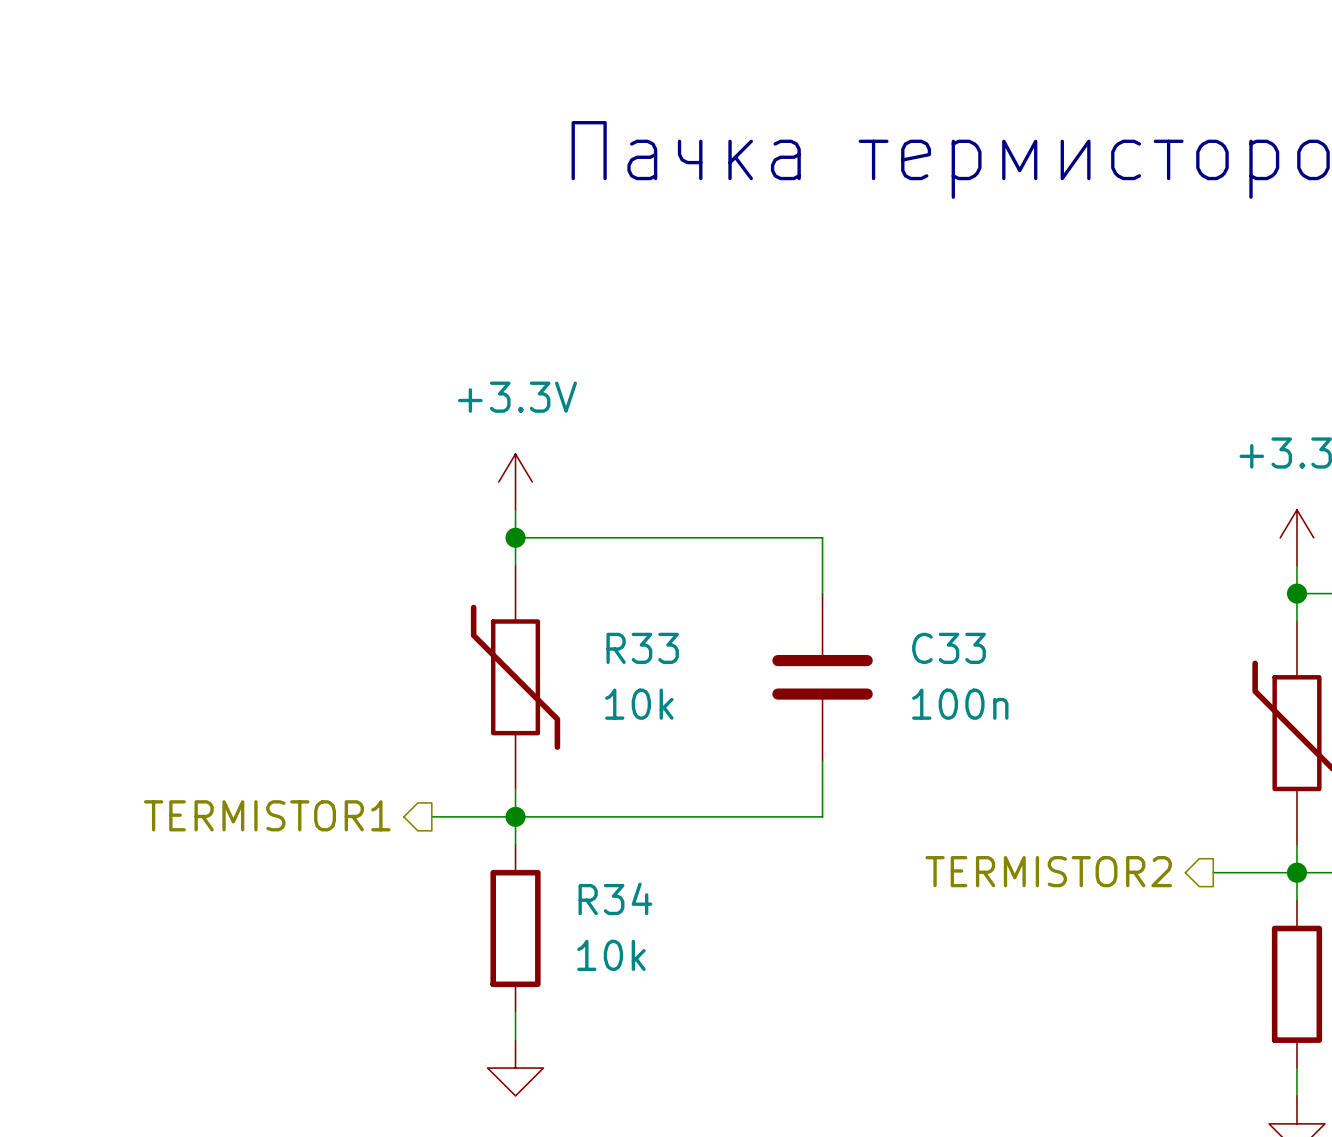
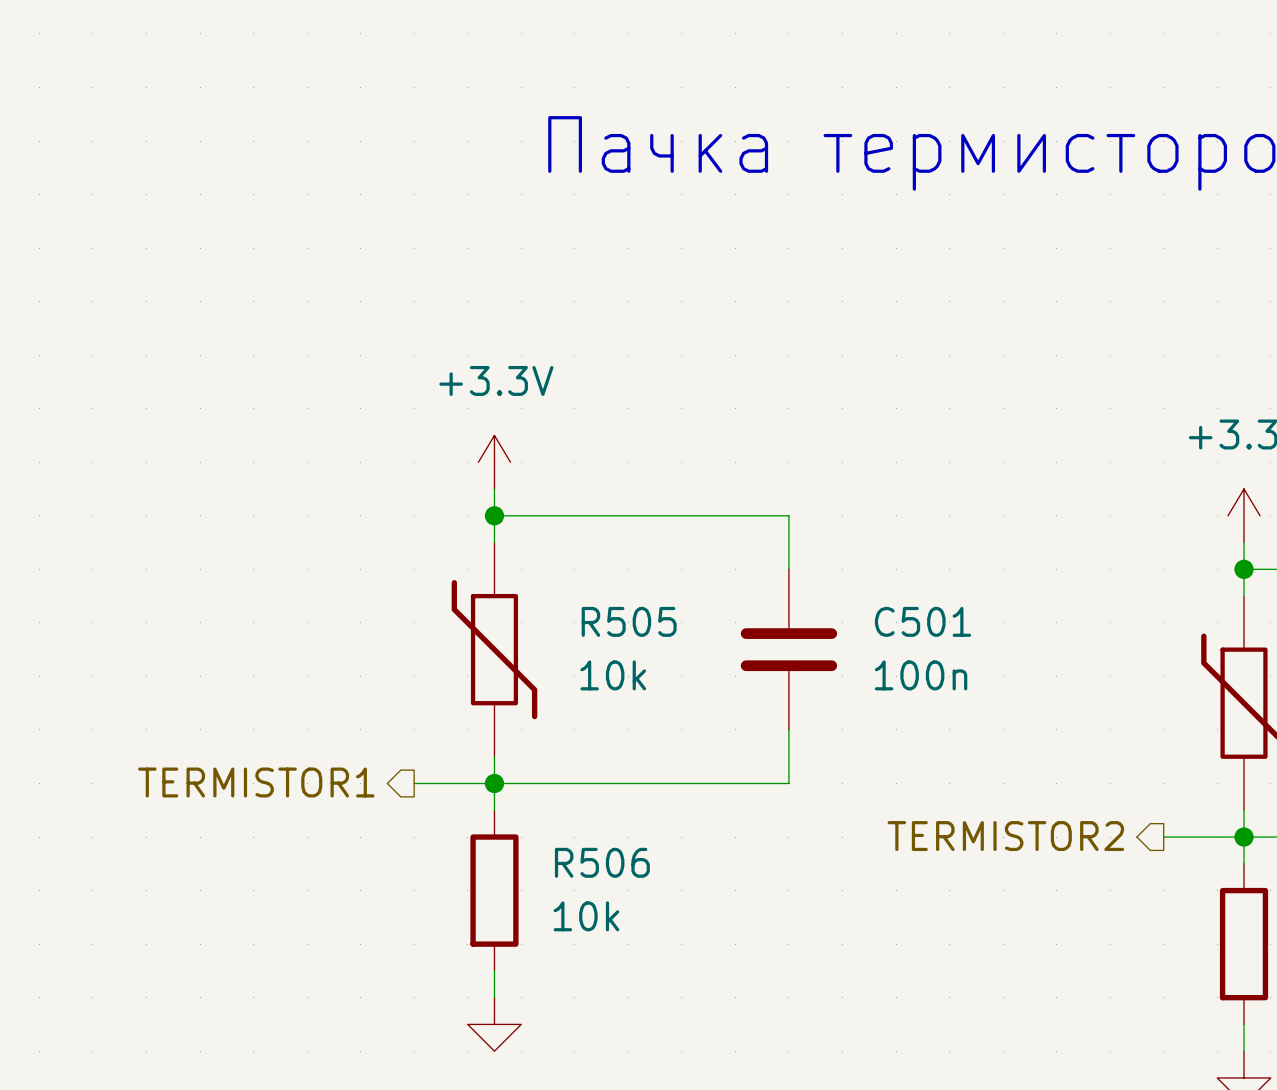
R33 name: R33 (642, 648) -> R505 (629, 621)
C33 name: C33 (949, 648) -> C501 (922, 621)
R34 name: R34 (615, 898) -> R506 (602, 862)

